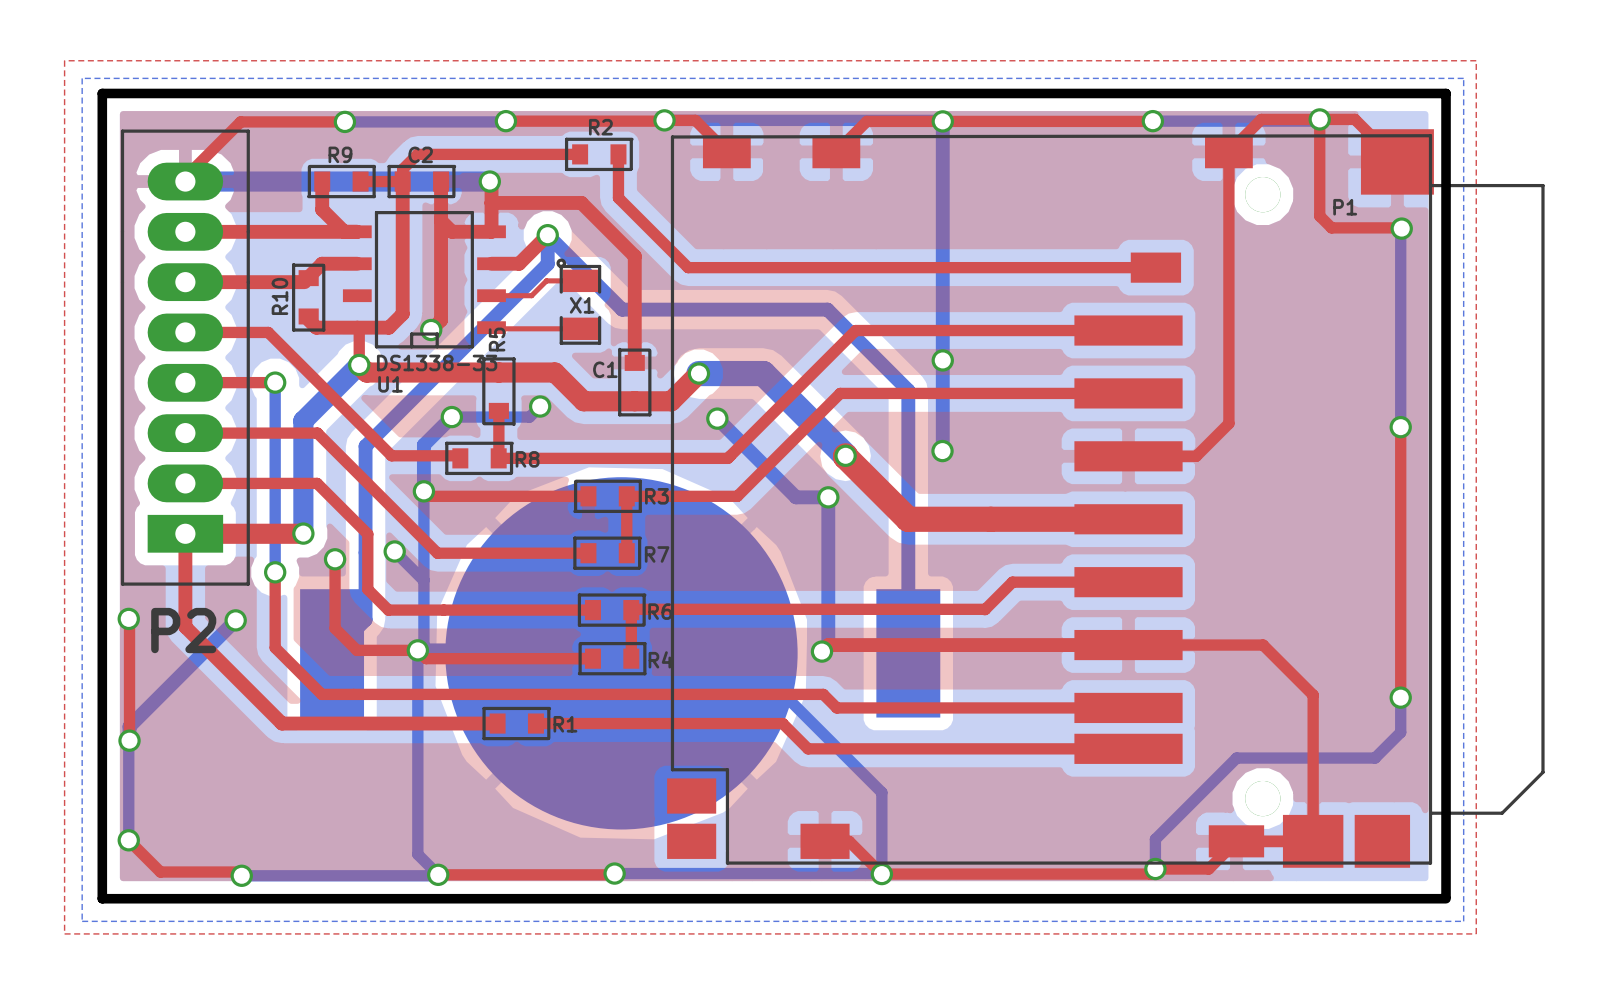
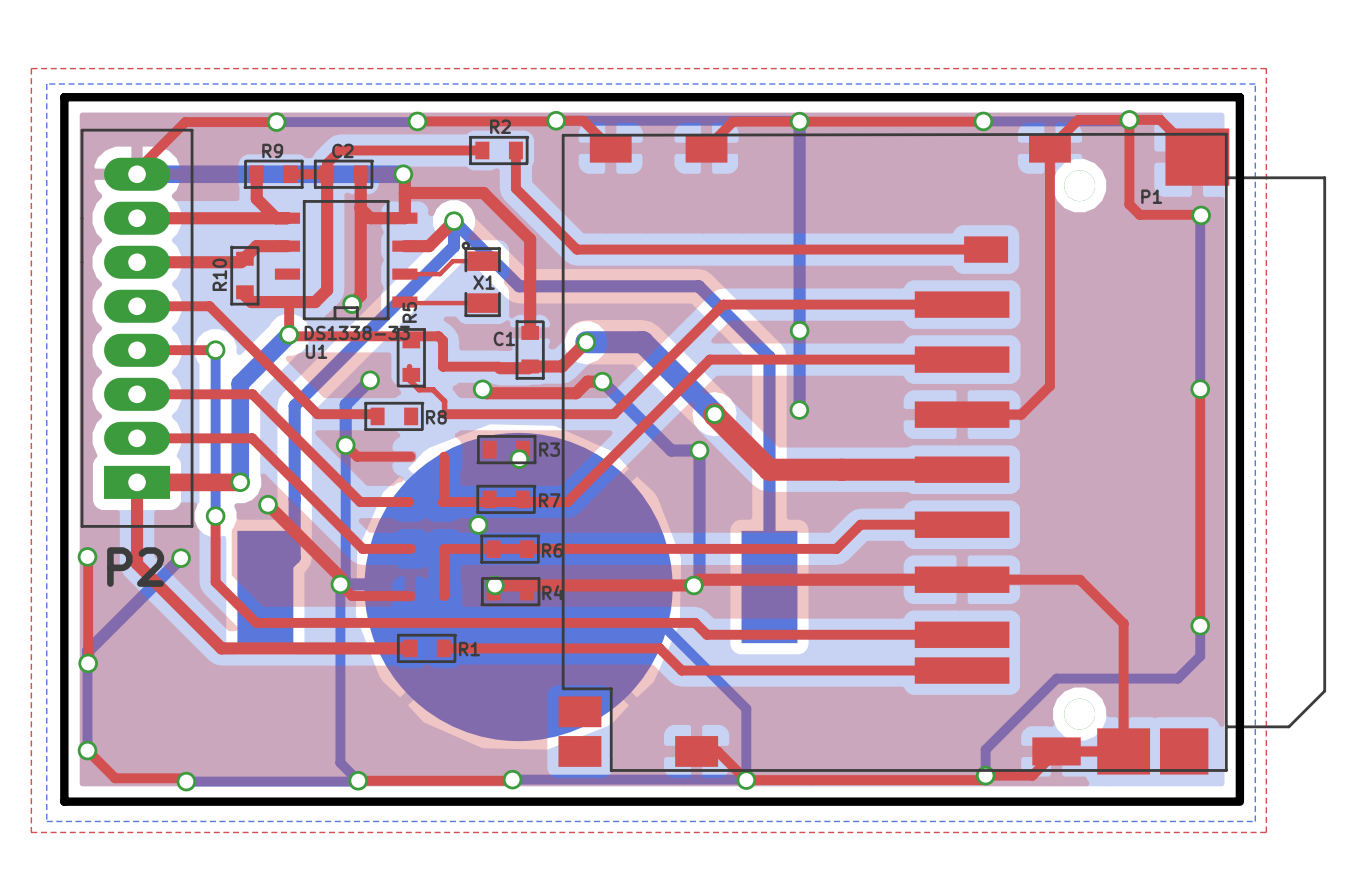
top track: (359, 364) (366, 372) (554, 372) (583, 401) (634, 401) -> (287, 331) (292, 336) (438, 336) (443, 340) (443, 366) (528, 368) (530, 366)
top track width: thick (698, 373) (671, 401) (634, 401) -> thin (586, 342) (562, 366) (530, 366)
bottom track: (540, 406) (529, 417) (451, 417) -> none
via position: (540, 406) -> (482, 389)
top track: (498, 410) (498, 458) -> none
top track: none -> (602, 381) (587, 381) (576, 393) (486, 393) (482, 389)
top track: (730, 455) (727, 458) (498, 458) -> (613, 414) (444, 414) (444, 401) (433, 389) (419, 389) (409, 380) (409, 366)
top track: (428, 496) (588, 496) -> (350, 449) (357, 456) (410, 456)
top track: (737, 496) (626, 496) (626, 553) -> (619, 449) (567, 502) (442, 502) (444, 456)
via: none -> (519, 459)
top track: (367, 534) (367, 589) (388, 610) (592, 610) -> (296, 482) (362, 548) (411, 548)
bottom track: (394, 551) (423, 580) -> none
via: (394, 551) -> none
top track: (437, 553) (588, 553) -> (357, 499) (360, 502) (409, 502)
top track: (335, 559) (335, 628) (356, 650) (417, 650) -> (267, 504) (340, 577) (340, 584)
via: none -> (478, 524)
top track: (985, 609) (632, 609) (631, 658) -> (836, 548) (444, 548) (443, 596)
top track: none -> (494, 585) (693, 585)
via: none -> (494, 585)
top track: (426, 658) (592, 658) -> (347, 591) (352, 596) (410, 596)

